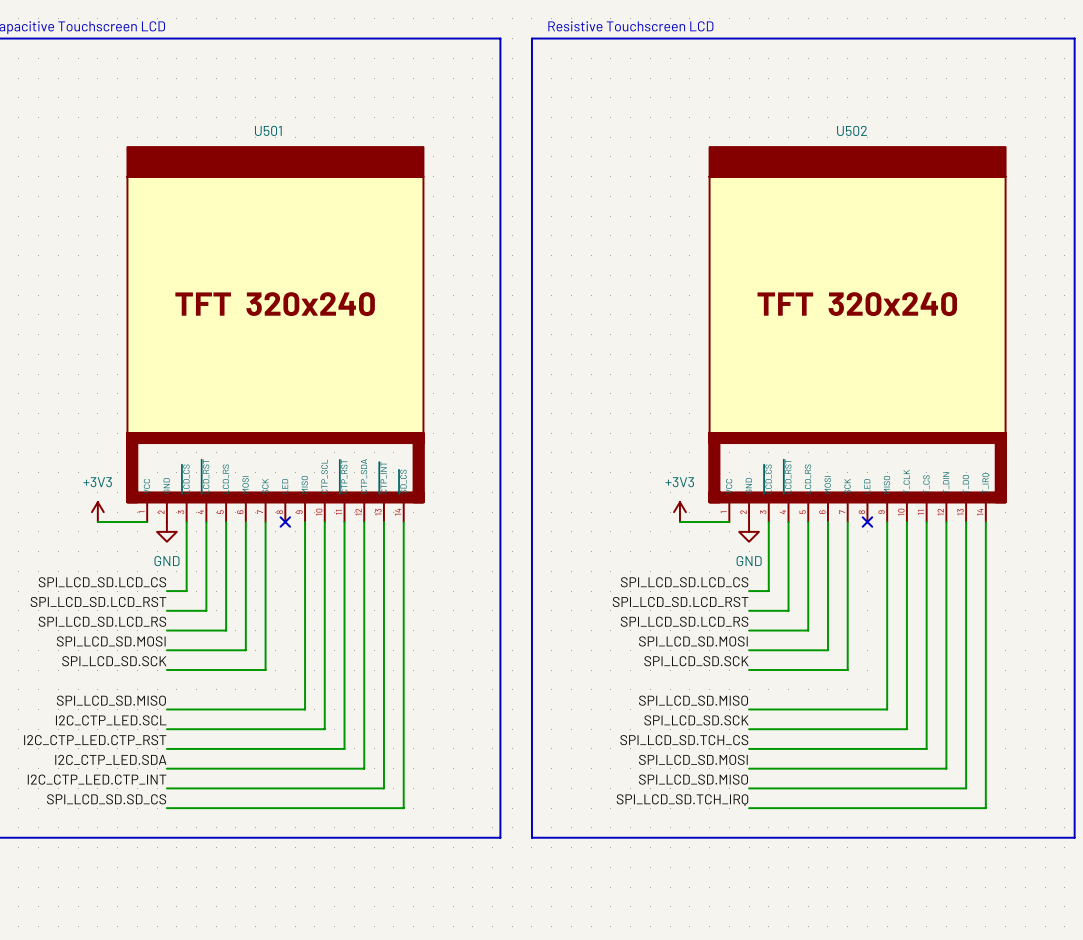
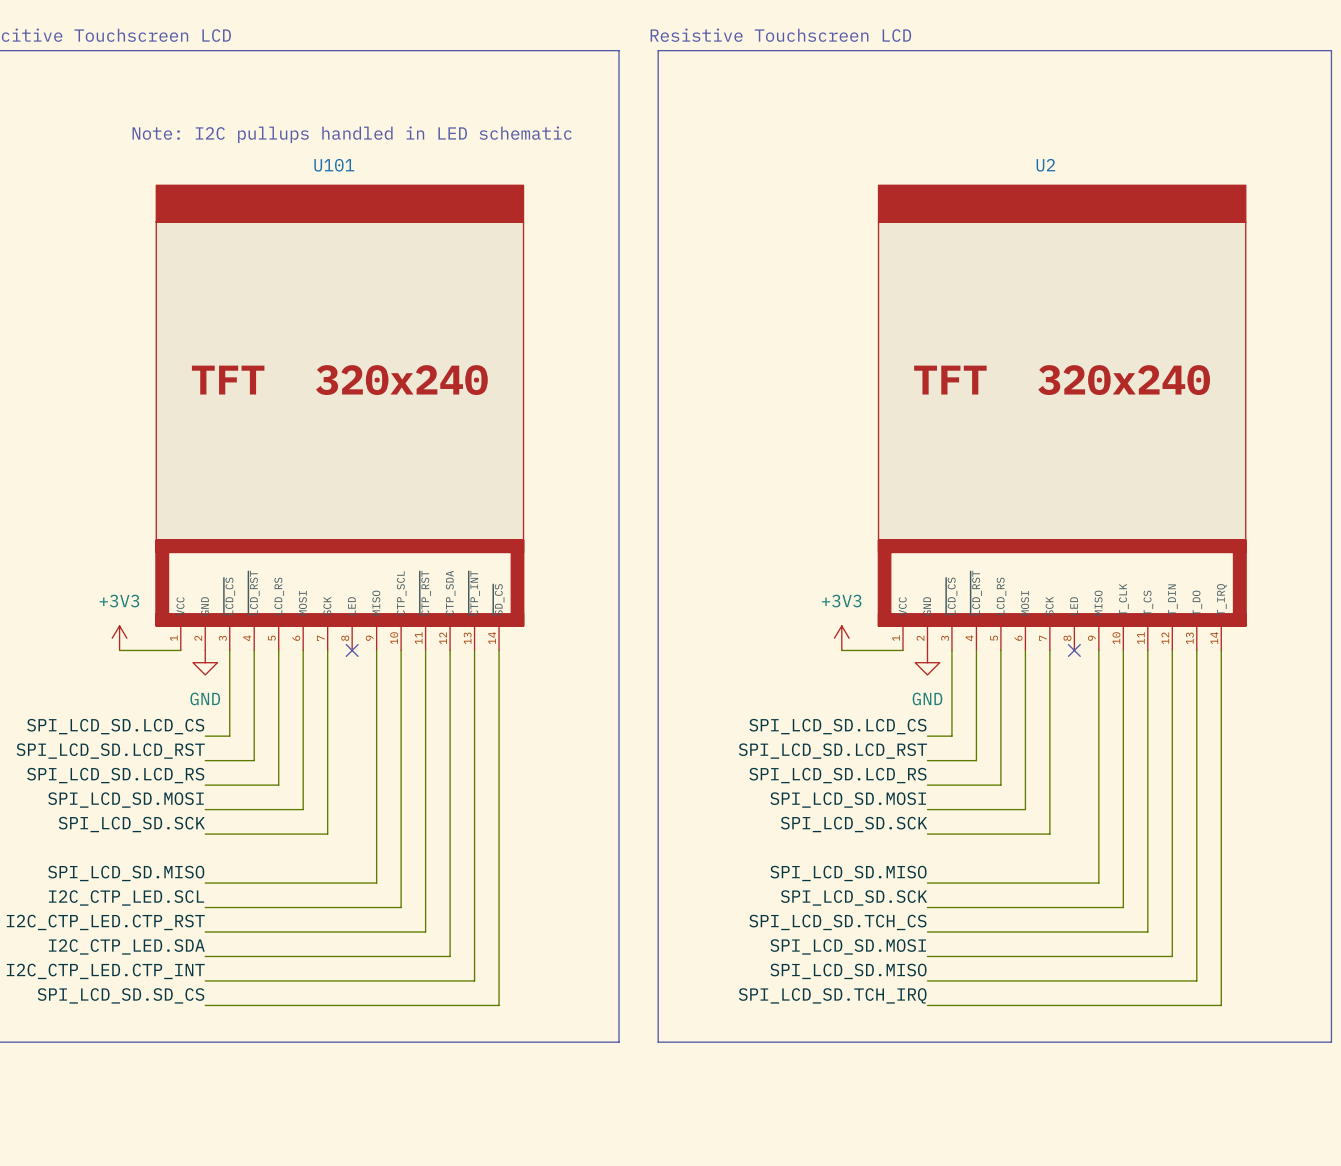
text: none -> Note: I2C pullups handled in LED schematic (352, 134)
U501 name: U501 (268, 130) -> U101 (334, 165)
U502 name: U502 (852, 130) -> U2 (1045, 165)

